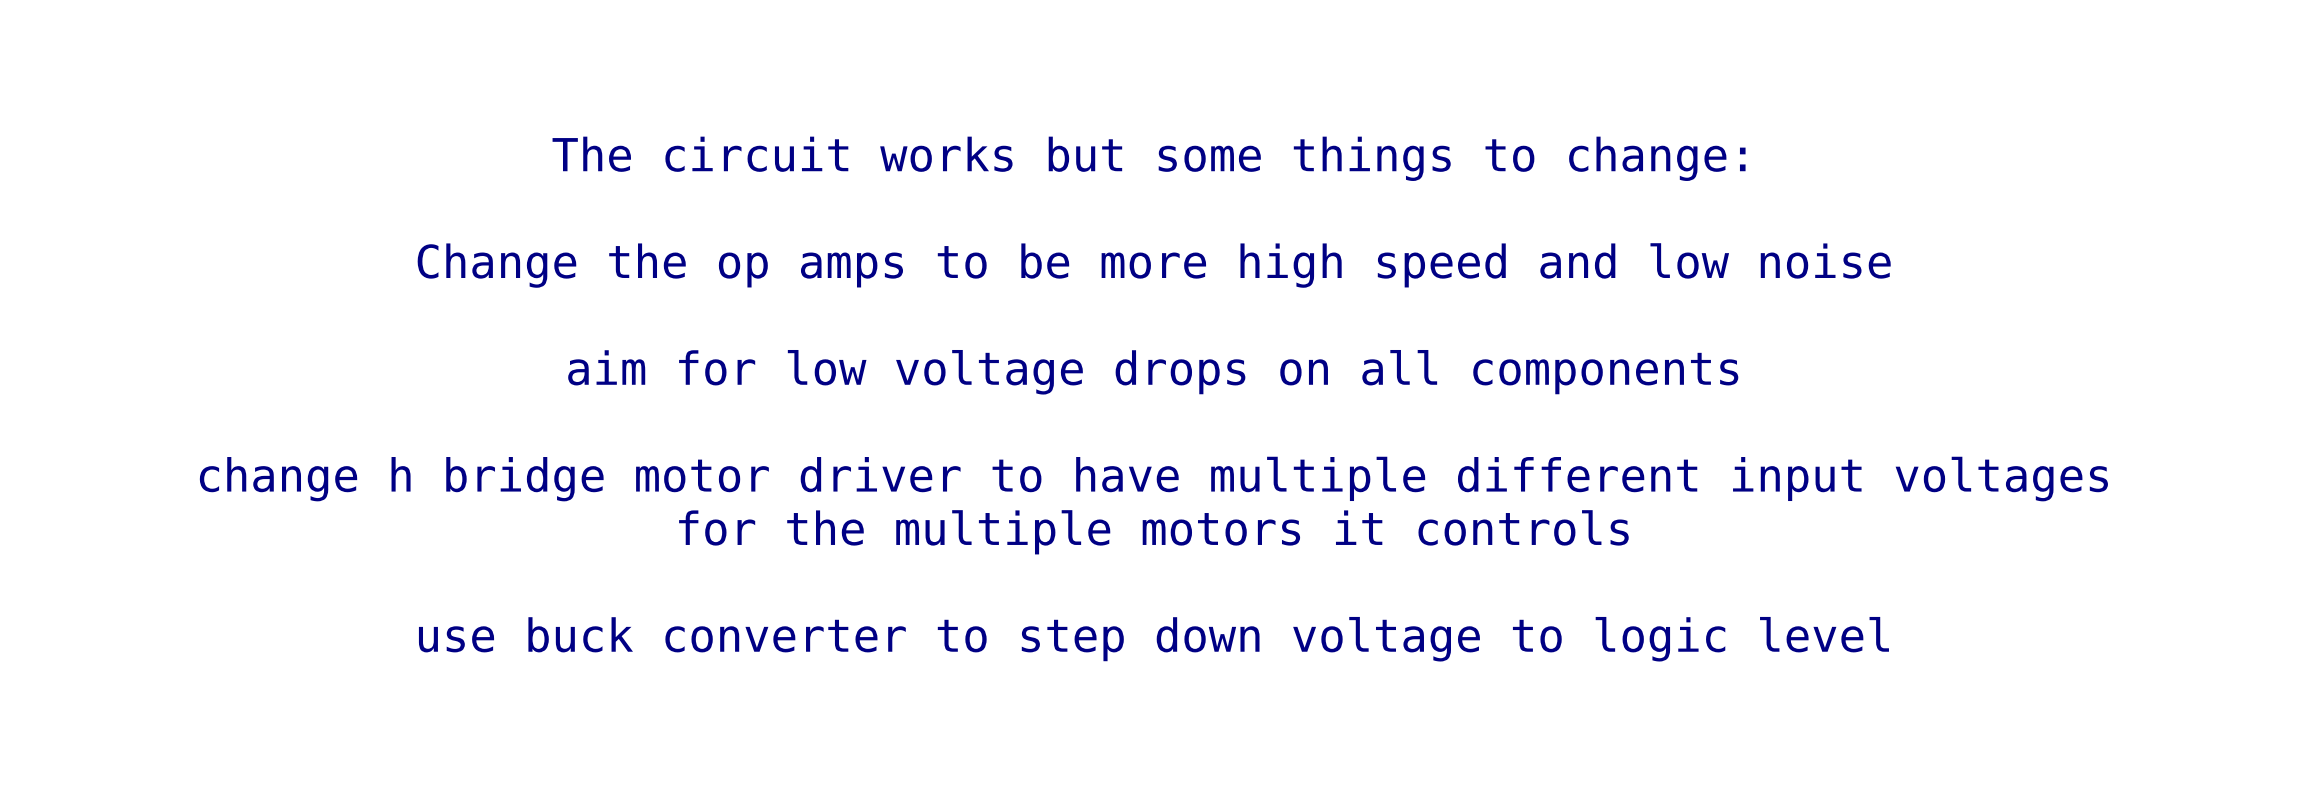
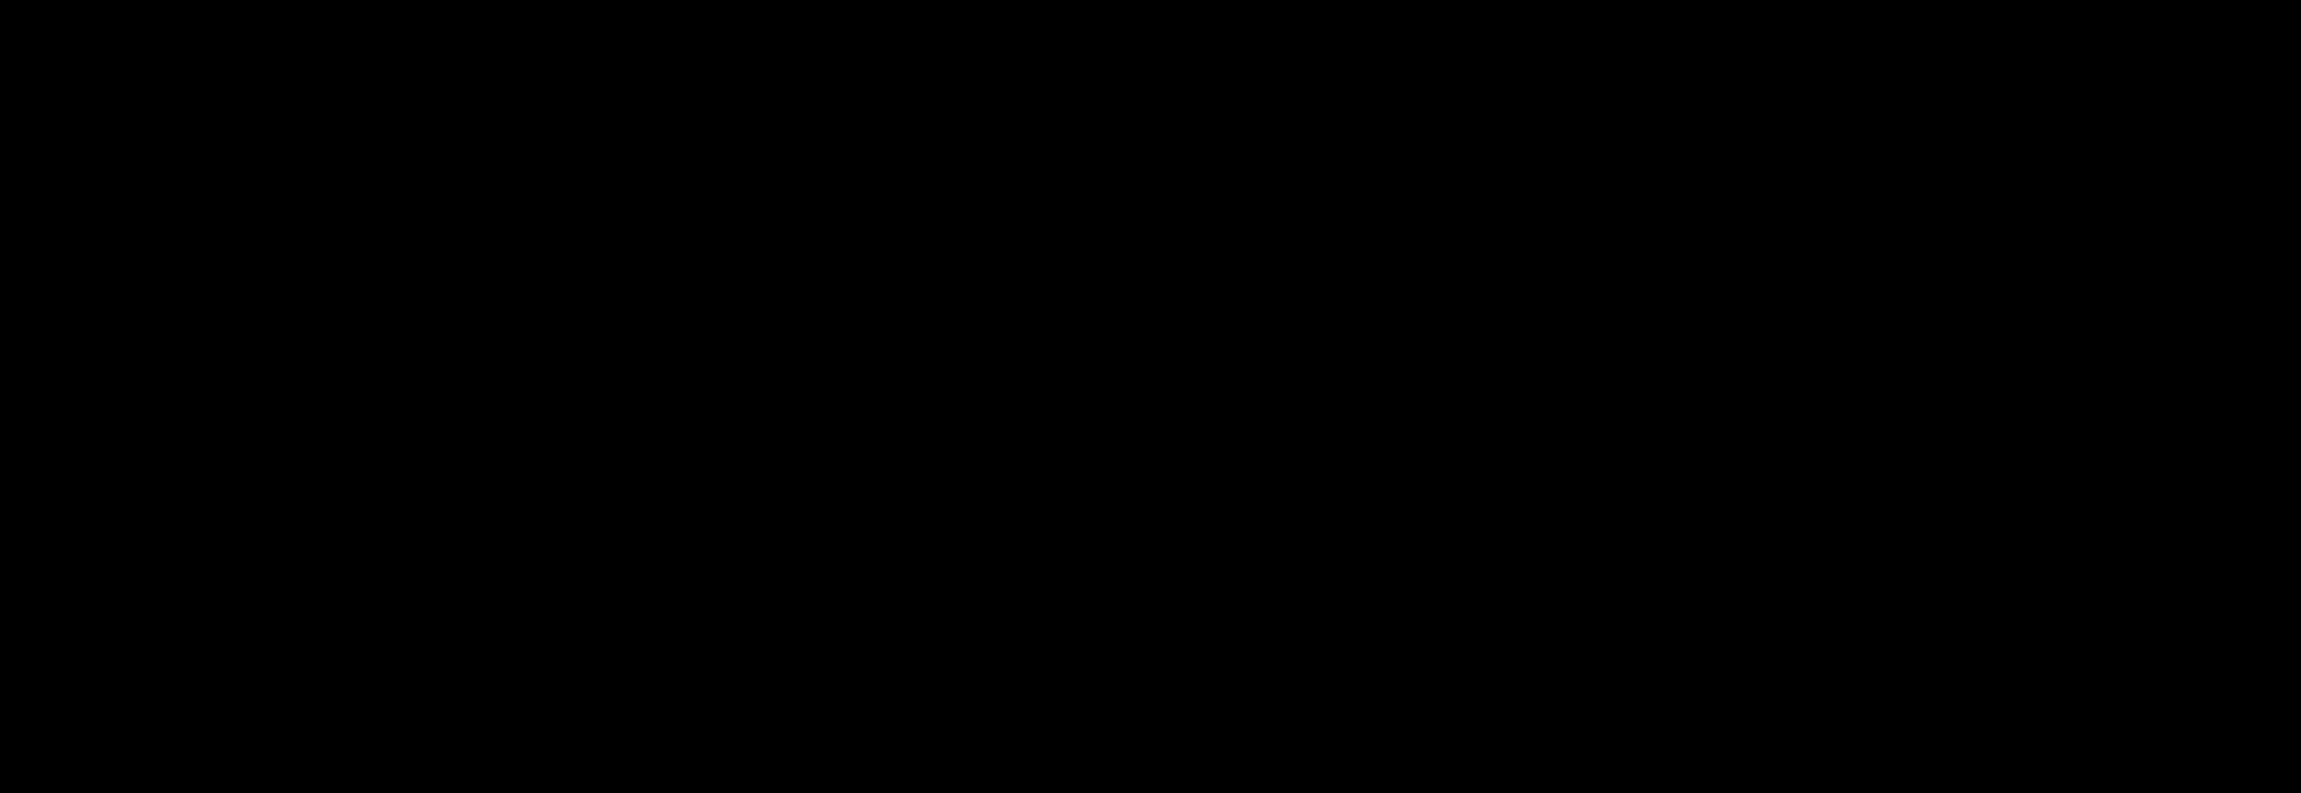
text: The circuit works but some things to change: (1149, 158) -> none
text: Change the op amps to be more high speed and low noise (1154, 265) -> none
text: aim for low voltage drops on all components (1153, 372) -> none
text: change h bridge motor driver to have multiple different input voltages (1153, 479) -> none
text: for the multiple motors it controls (1153, 532) -> none
text: use buck converter to step down voltage to logic level (1153, 639) -> none

